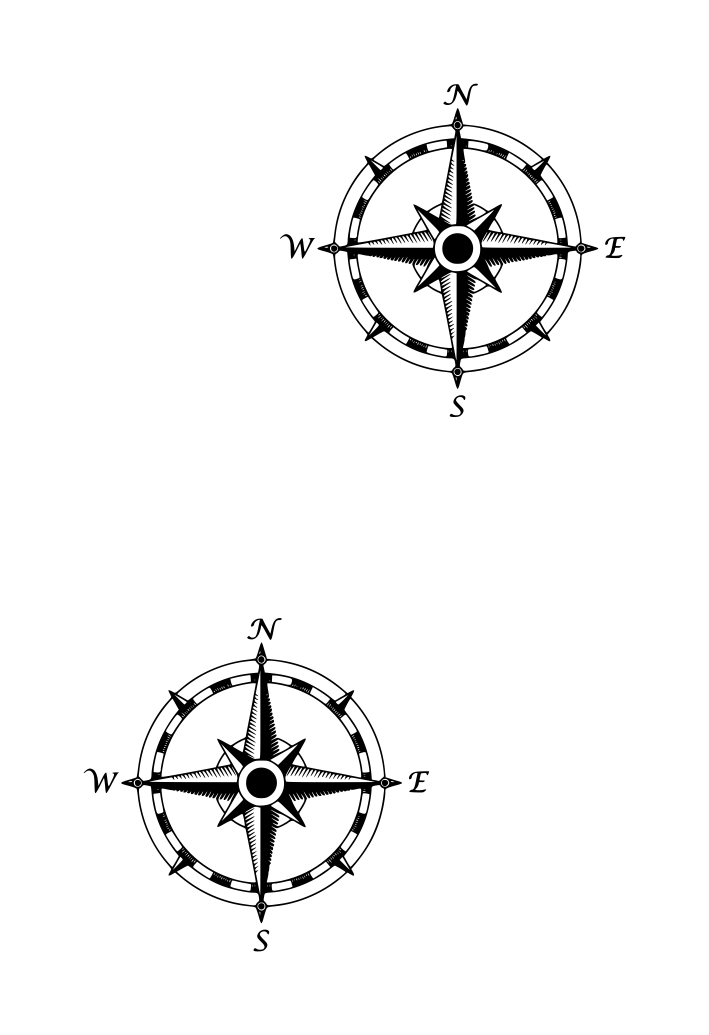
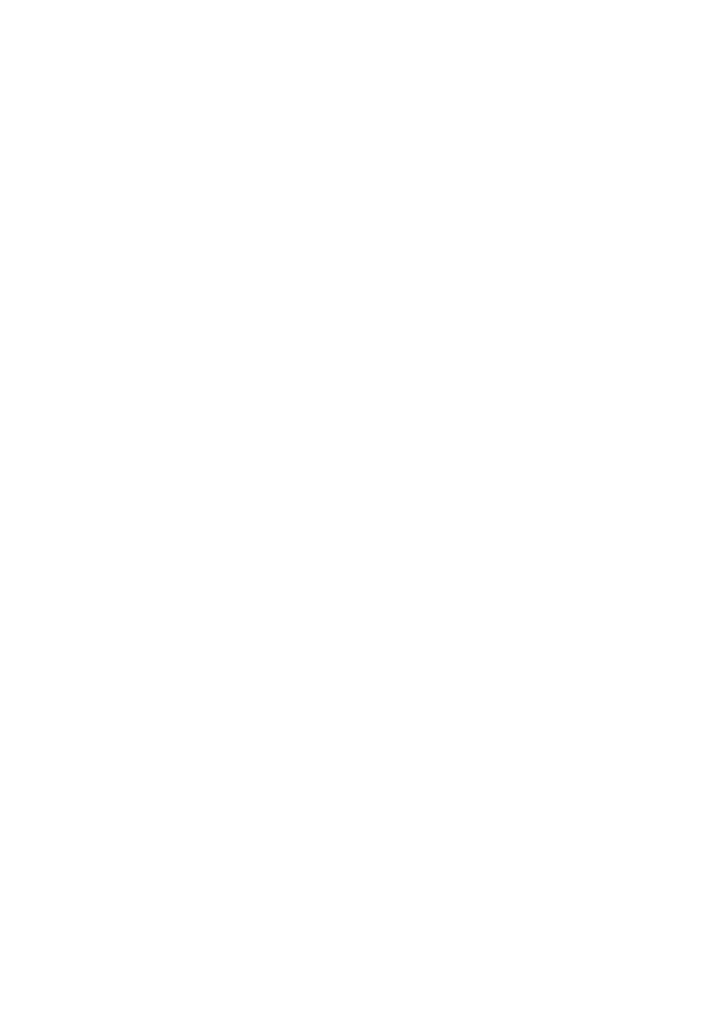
drawing: [279, 83, 626, 418] -> none
drawing: [83, 618, 430, 952] -> none

